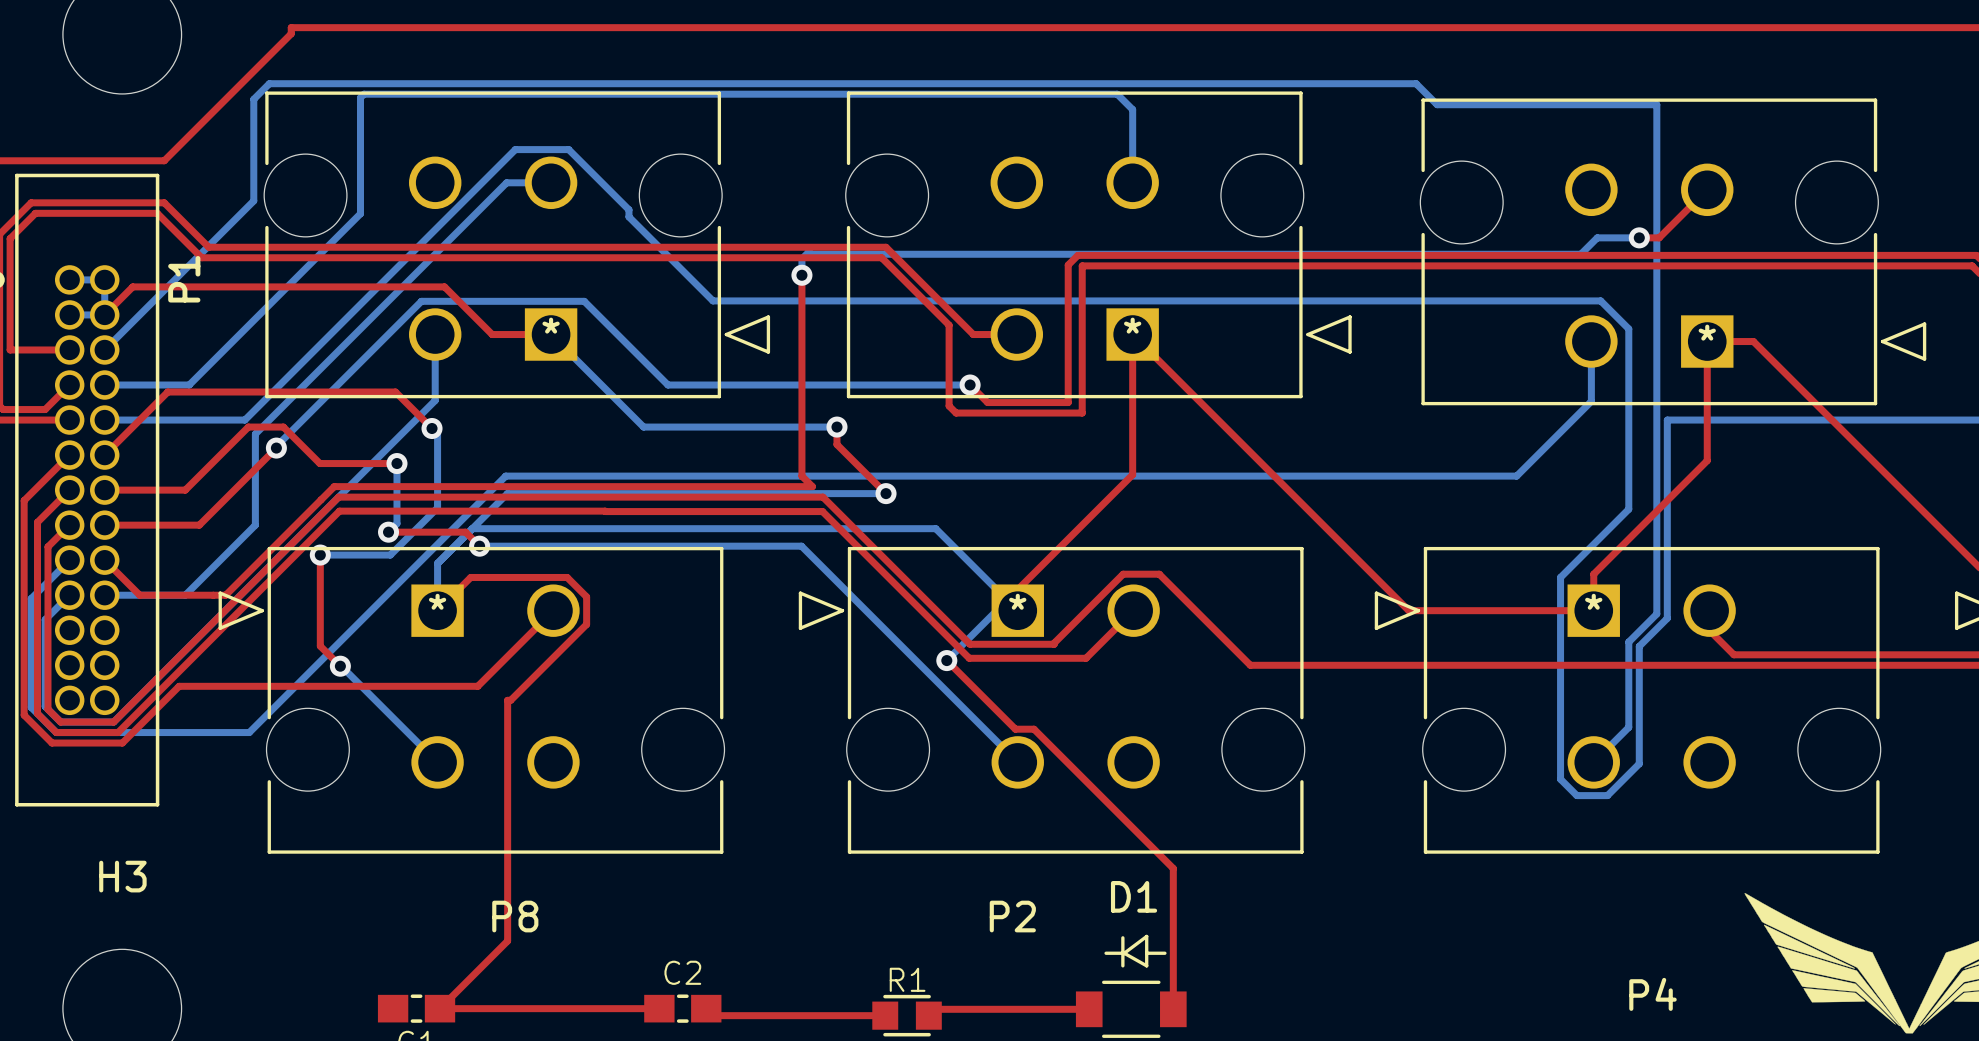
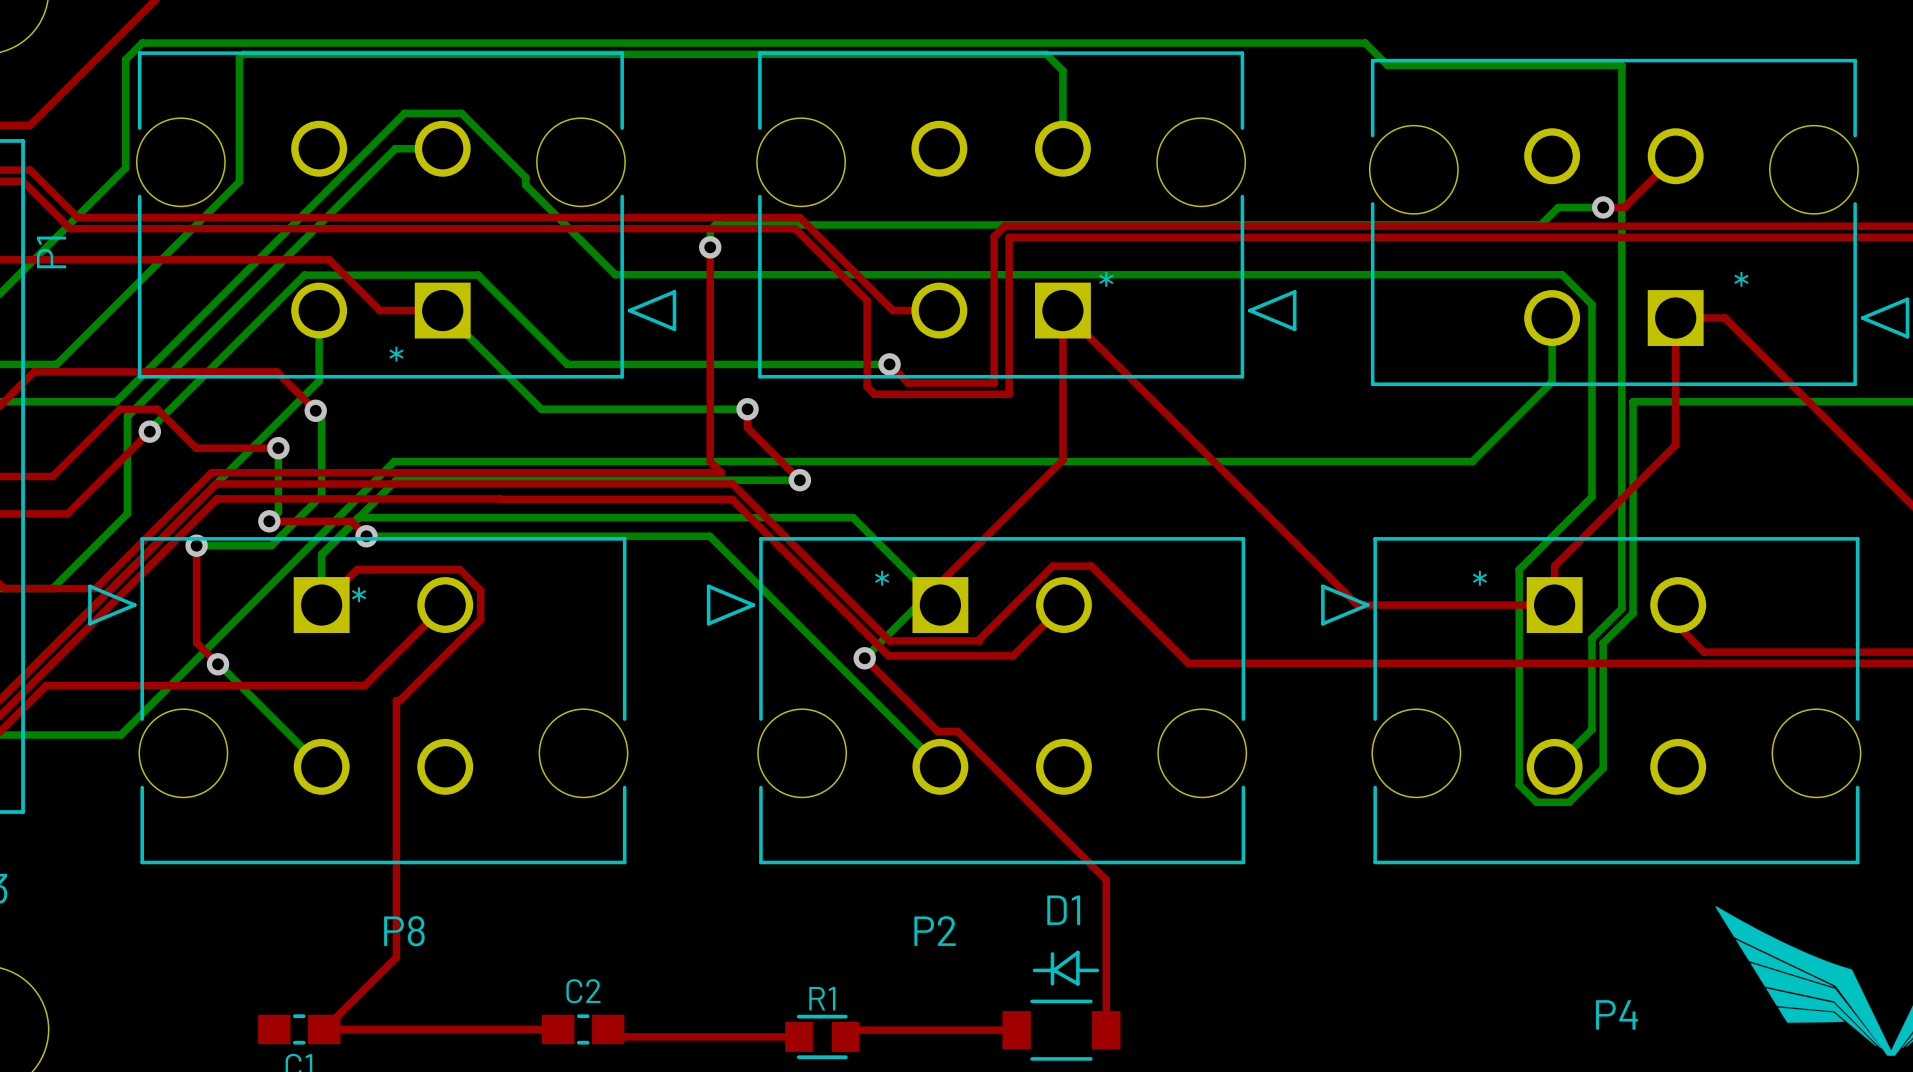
part text position: * (551, 325) -> * (396, 354)
part text position: * (1132, 325) -> * (1106, 279)
part text position: * (1707, 332) -> * (1741, 279)
P8 text position: * (437, 601) -> * (359, 594)
P2 text position: * (1017, 601) -> * (882, 578)
P4 text position: * (1593, 601) -> * (1479, 578)

